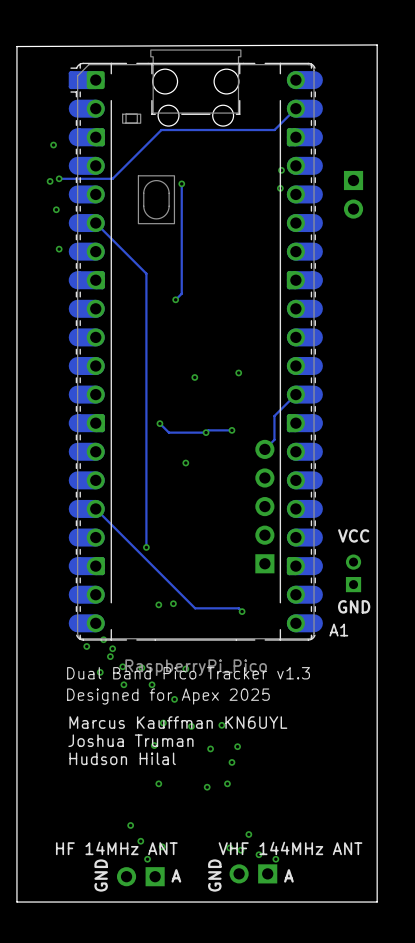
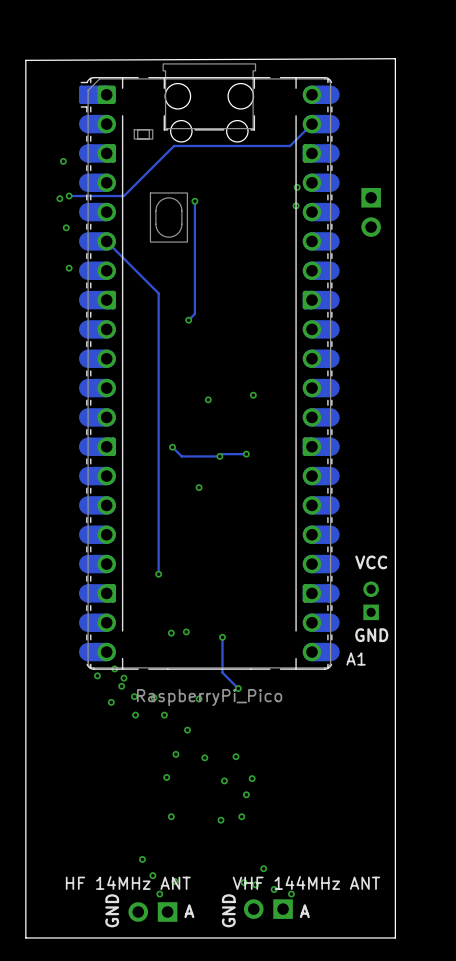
track: (295, 394) (274, 416) (274, 439) (264, 449) -> none
part: (264, 506) -> none
track: (95, 508) (195, 608) (238, 608) (242, 611) -> none
track: none -> (222, 637) (222, 672) (238, 688)
via: none -> (222, 637)
via: (242, 611) -> none
via: none -> (238, 688)
text: Dual Band Pico Tracker v1.3 (188, 673) -> none
text: Designed for Apex 2025 (168, 696) -> none
text: Marcus Kauffman KN6UYL (178, 722) -> none
text: Joshua Truman (130, 740) -> none
text: Hudson Hilal (122, 758) -> none

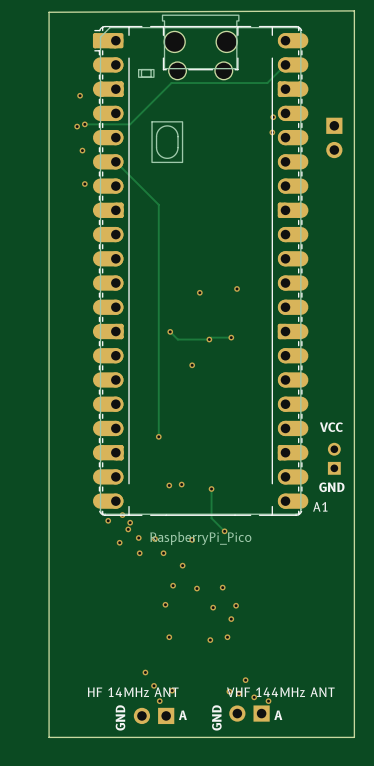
track: (194, 201) (194, 313) (188, 320) -> none
via: (194, 201) -> none
via: (188, 320) -> none

